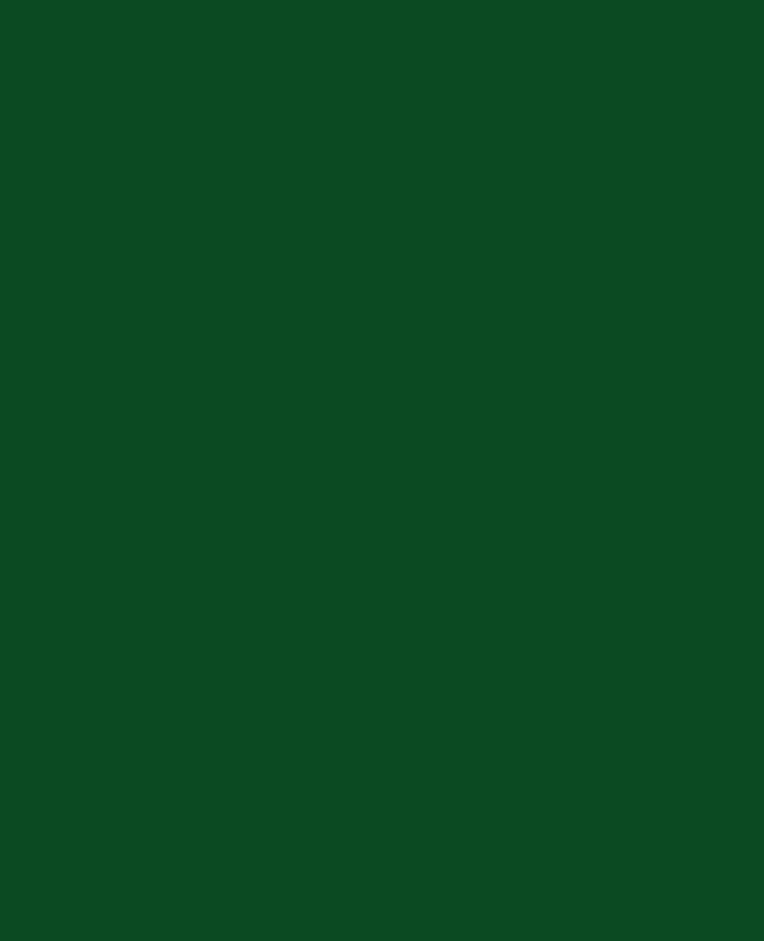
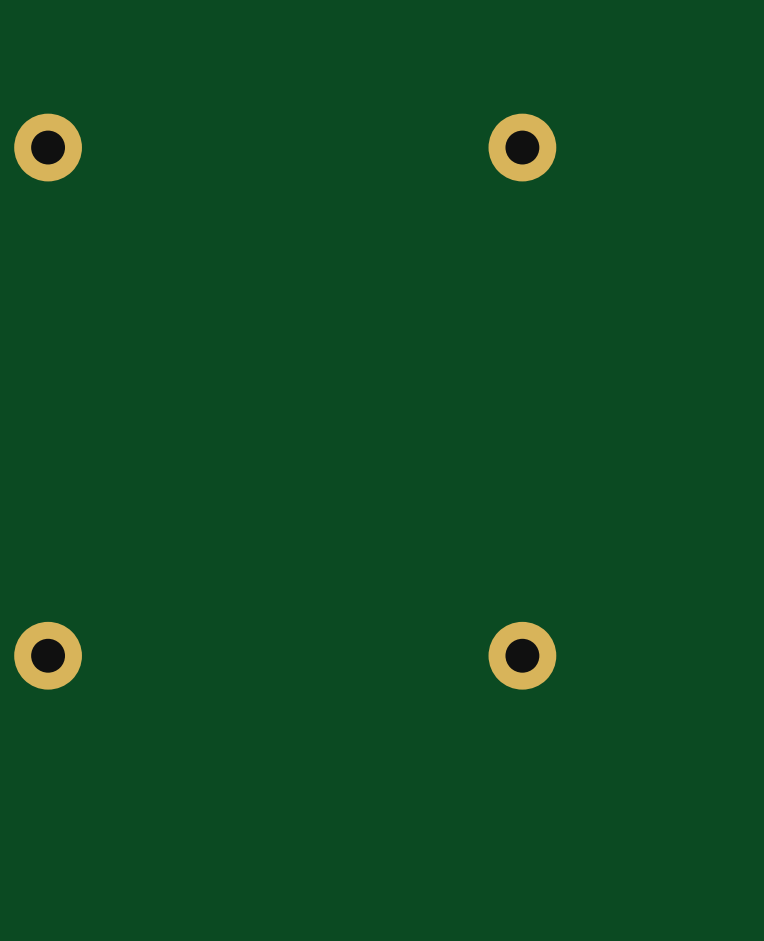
part: none -> (48, 147)
part: none -> (522, 147)
part: none -> (48, 655)
part: none -> (522, 655)

